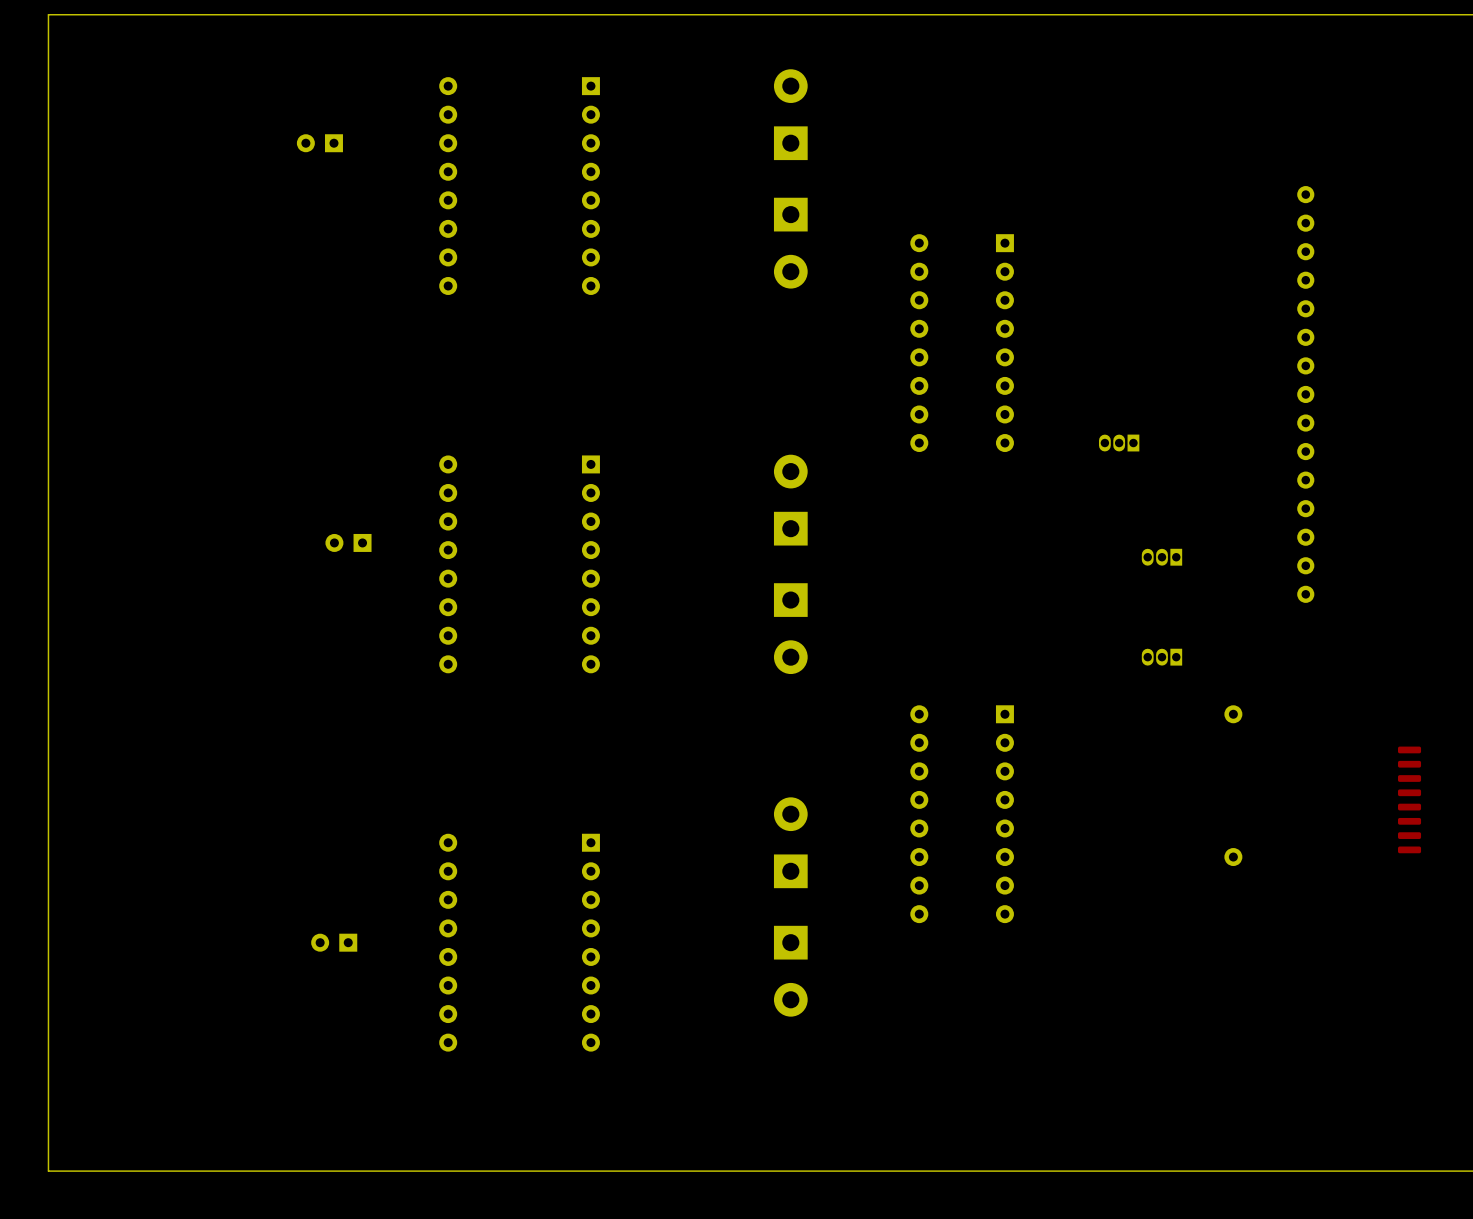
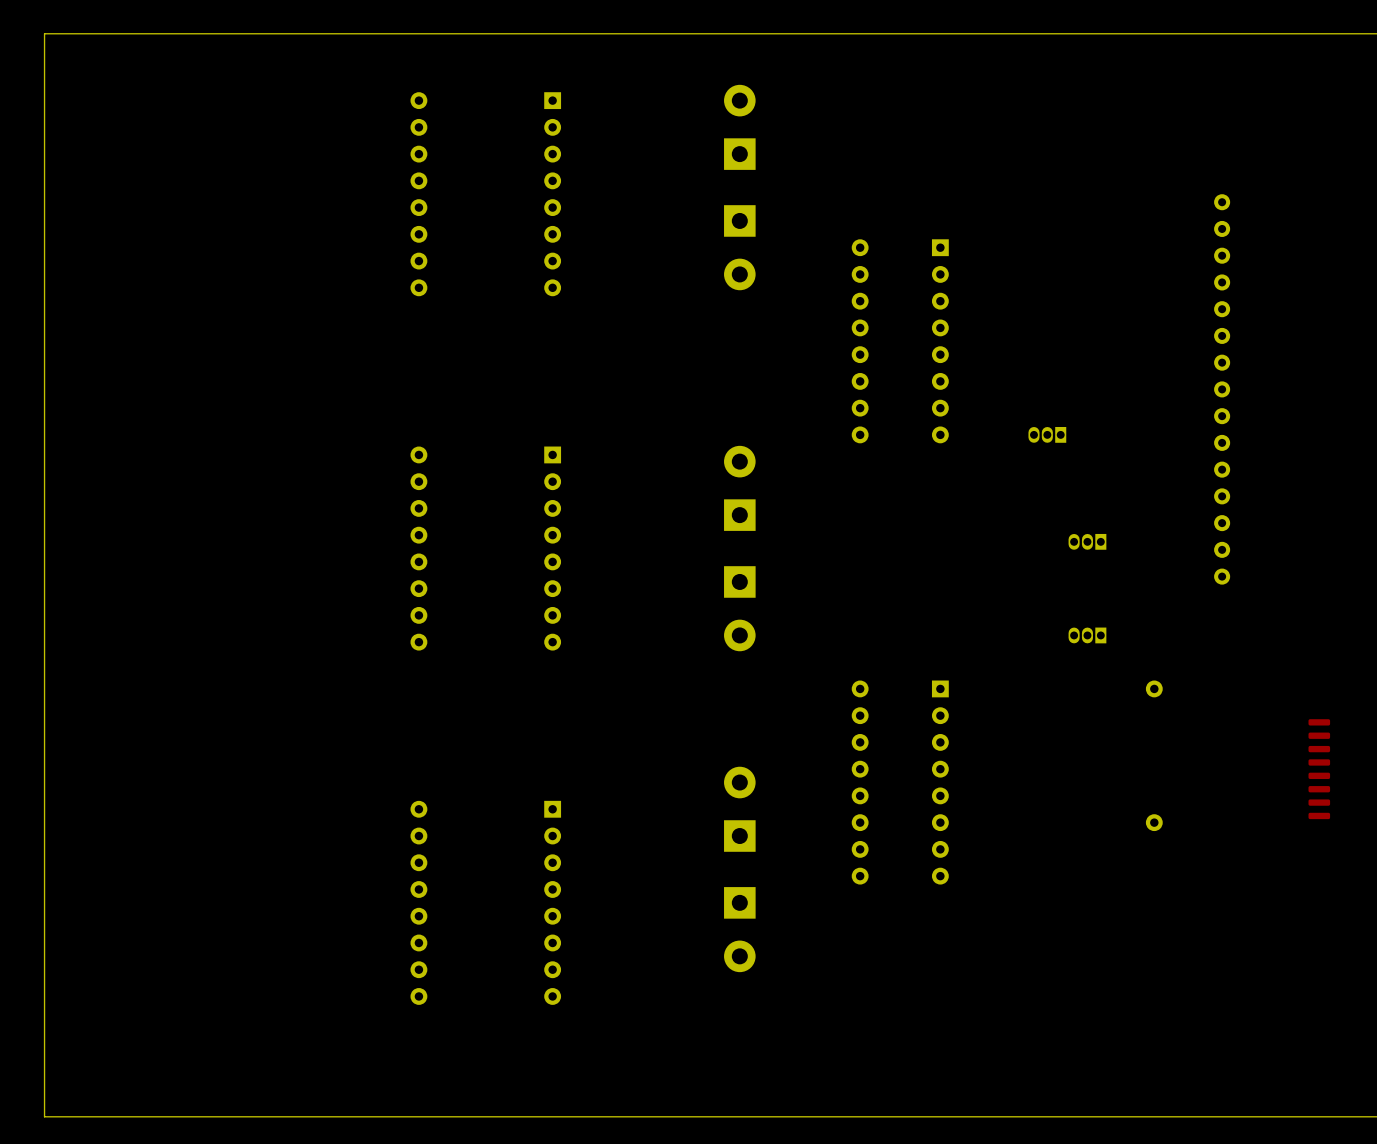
part: (319, 143) -> none
part: (348, 542) -> none
part: (334, 942) -> none

